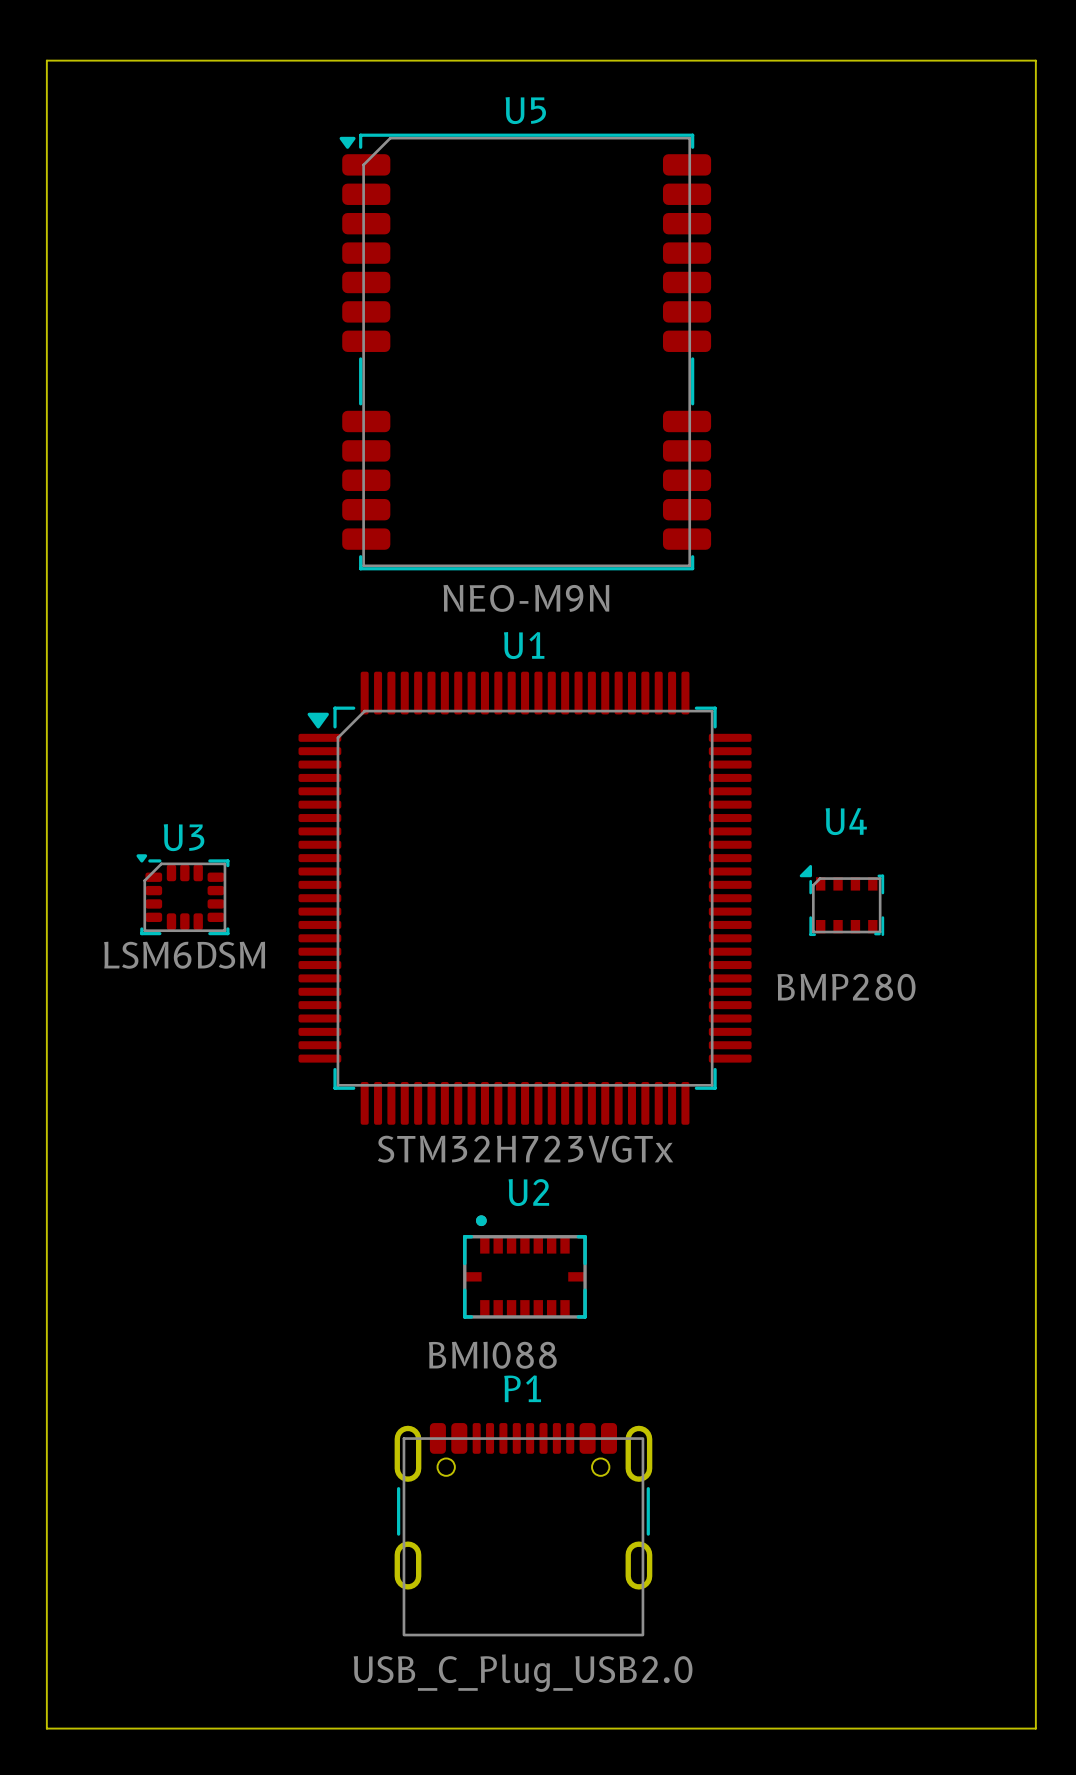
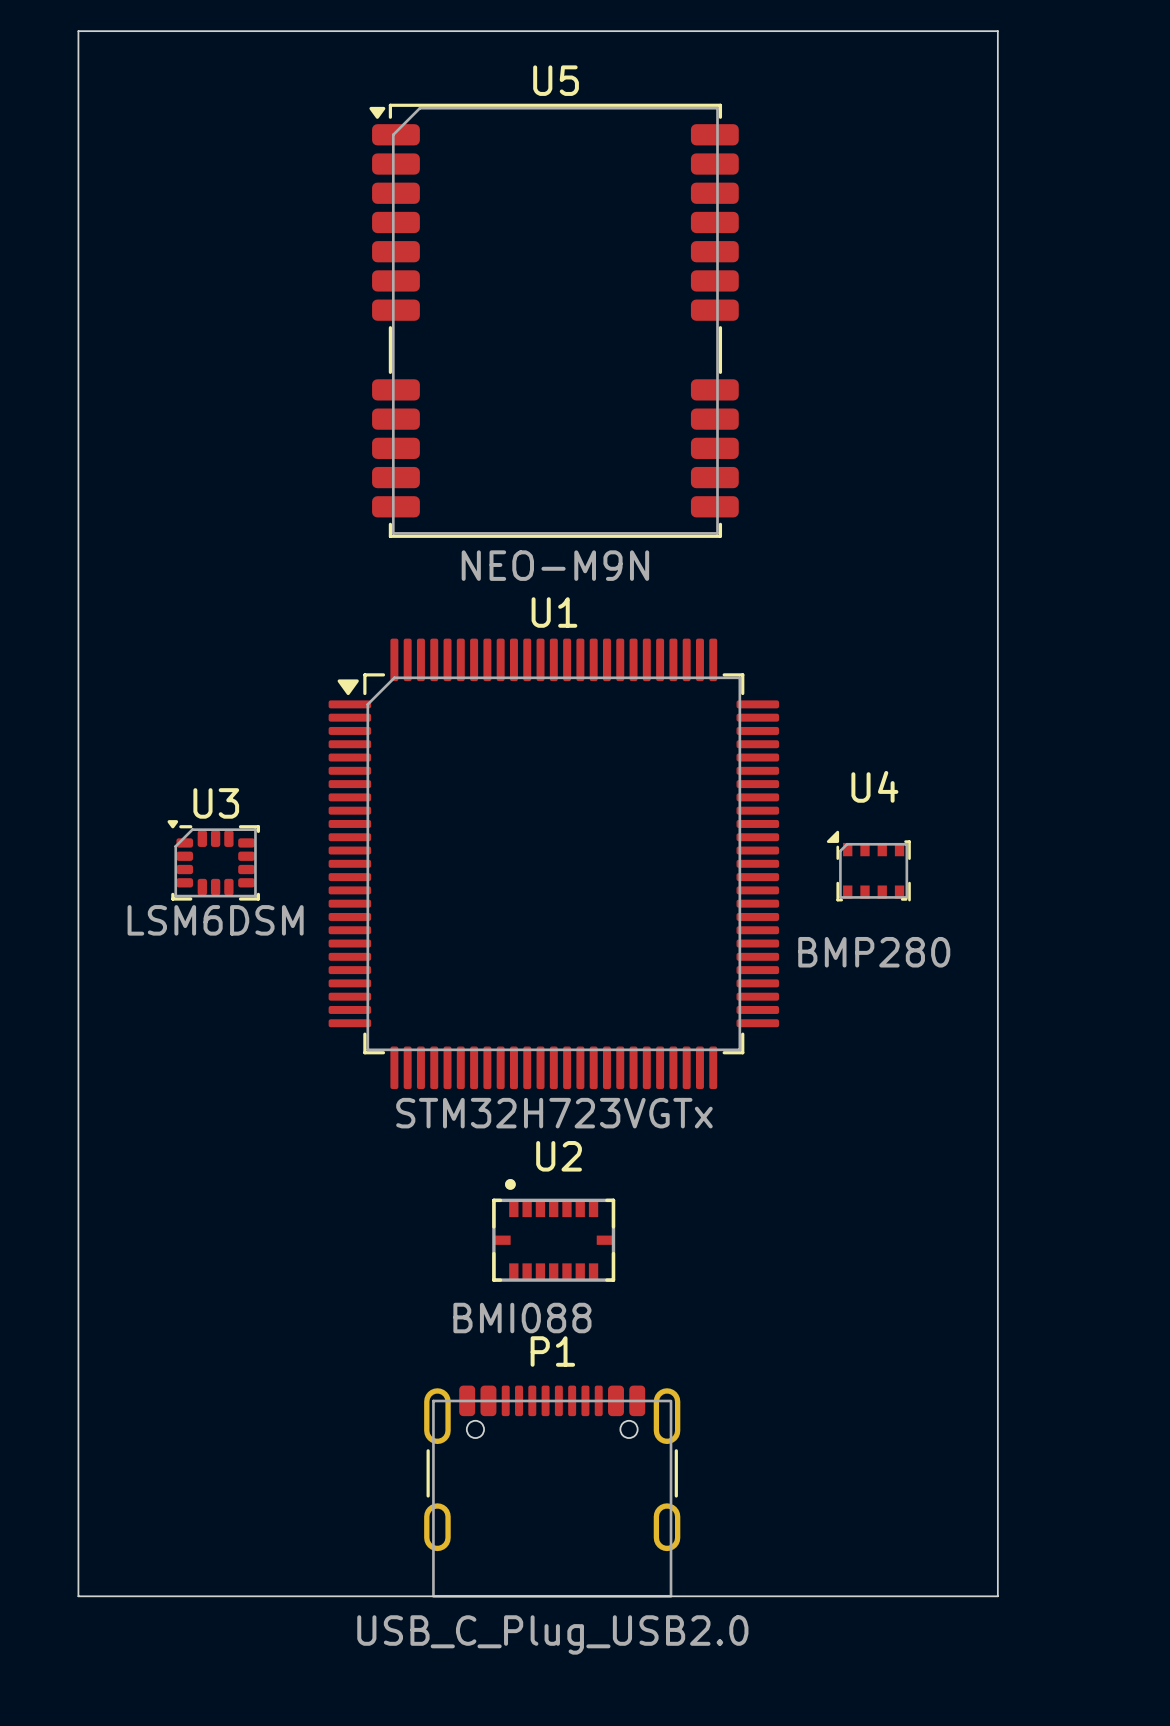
board edge: (971, 60) (1035, 60) (1035, 1728) (46, 1728) (46, 1635) -> (997, 31) (997, 1596) (78, 1596)

